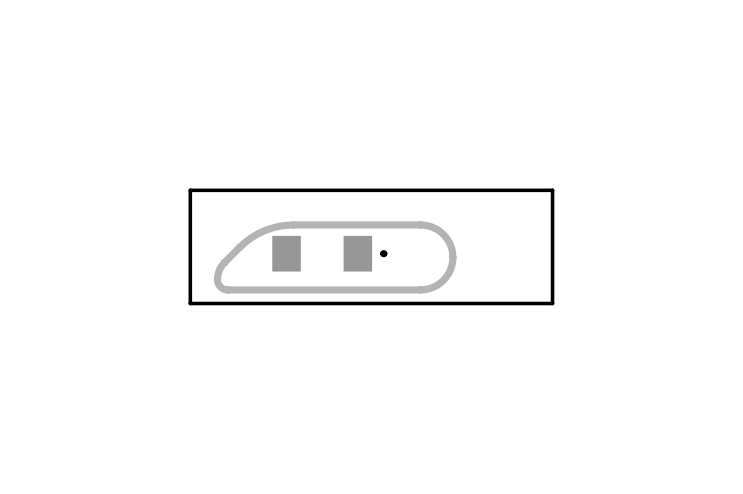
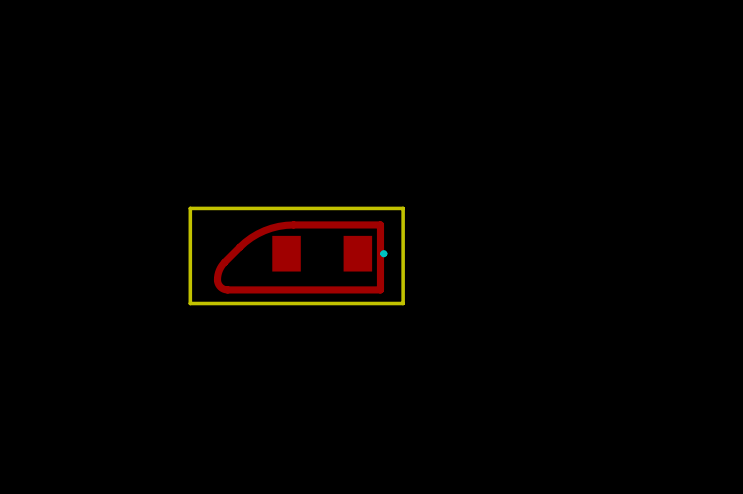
board edge: (190, 208) (190, 190) (552, 190) (552, 303) (403, 303) -> (190, 208) (403, 208) (403, 303)
track: (380, 224) (420, 224) (432, 227) (446, 237) (451, 249) (452, 257) (448, 273) (440, 283) (432, 287) (420, 289) (380, 289) -> (380, 224) (380, 289)

